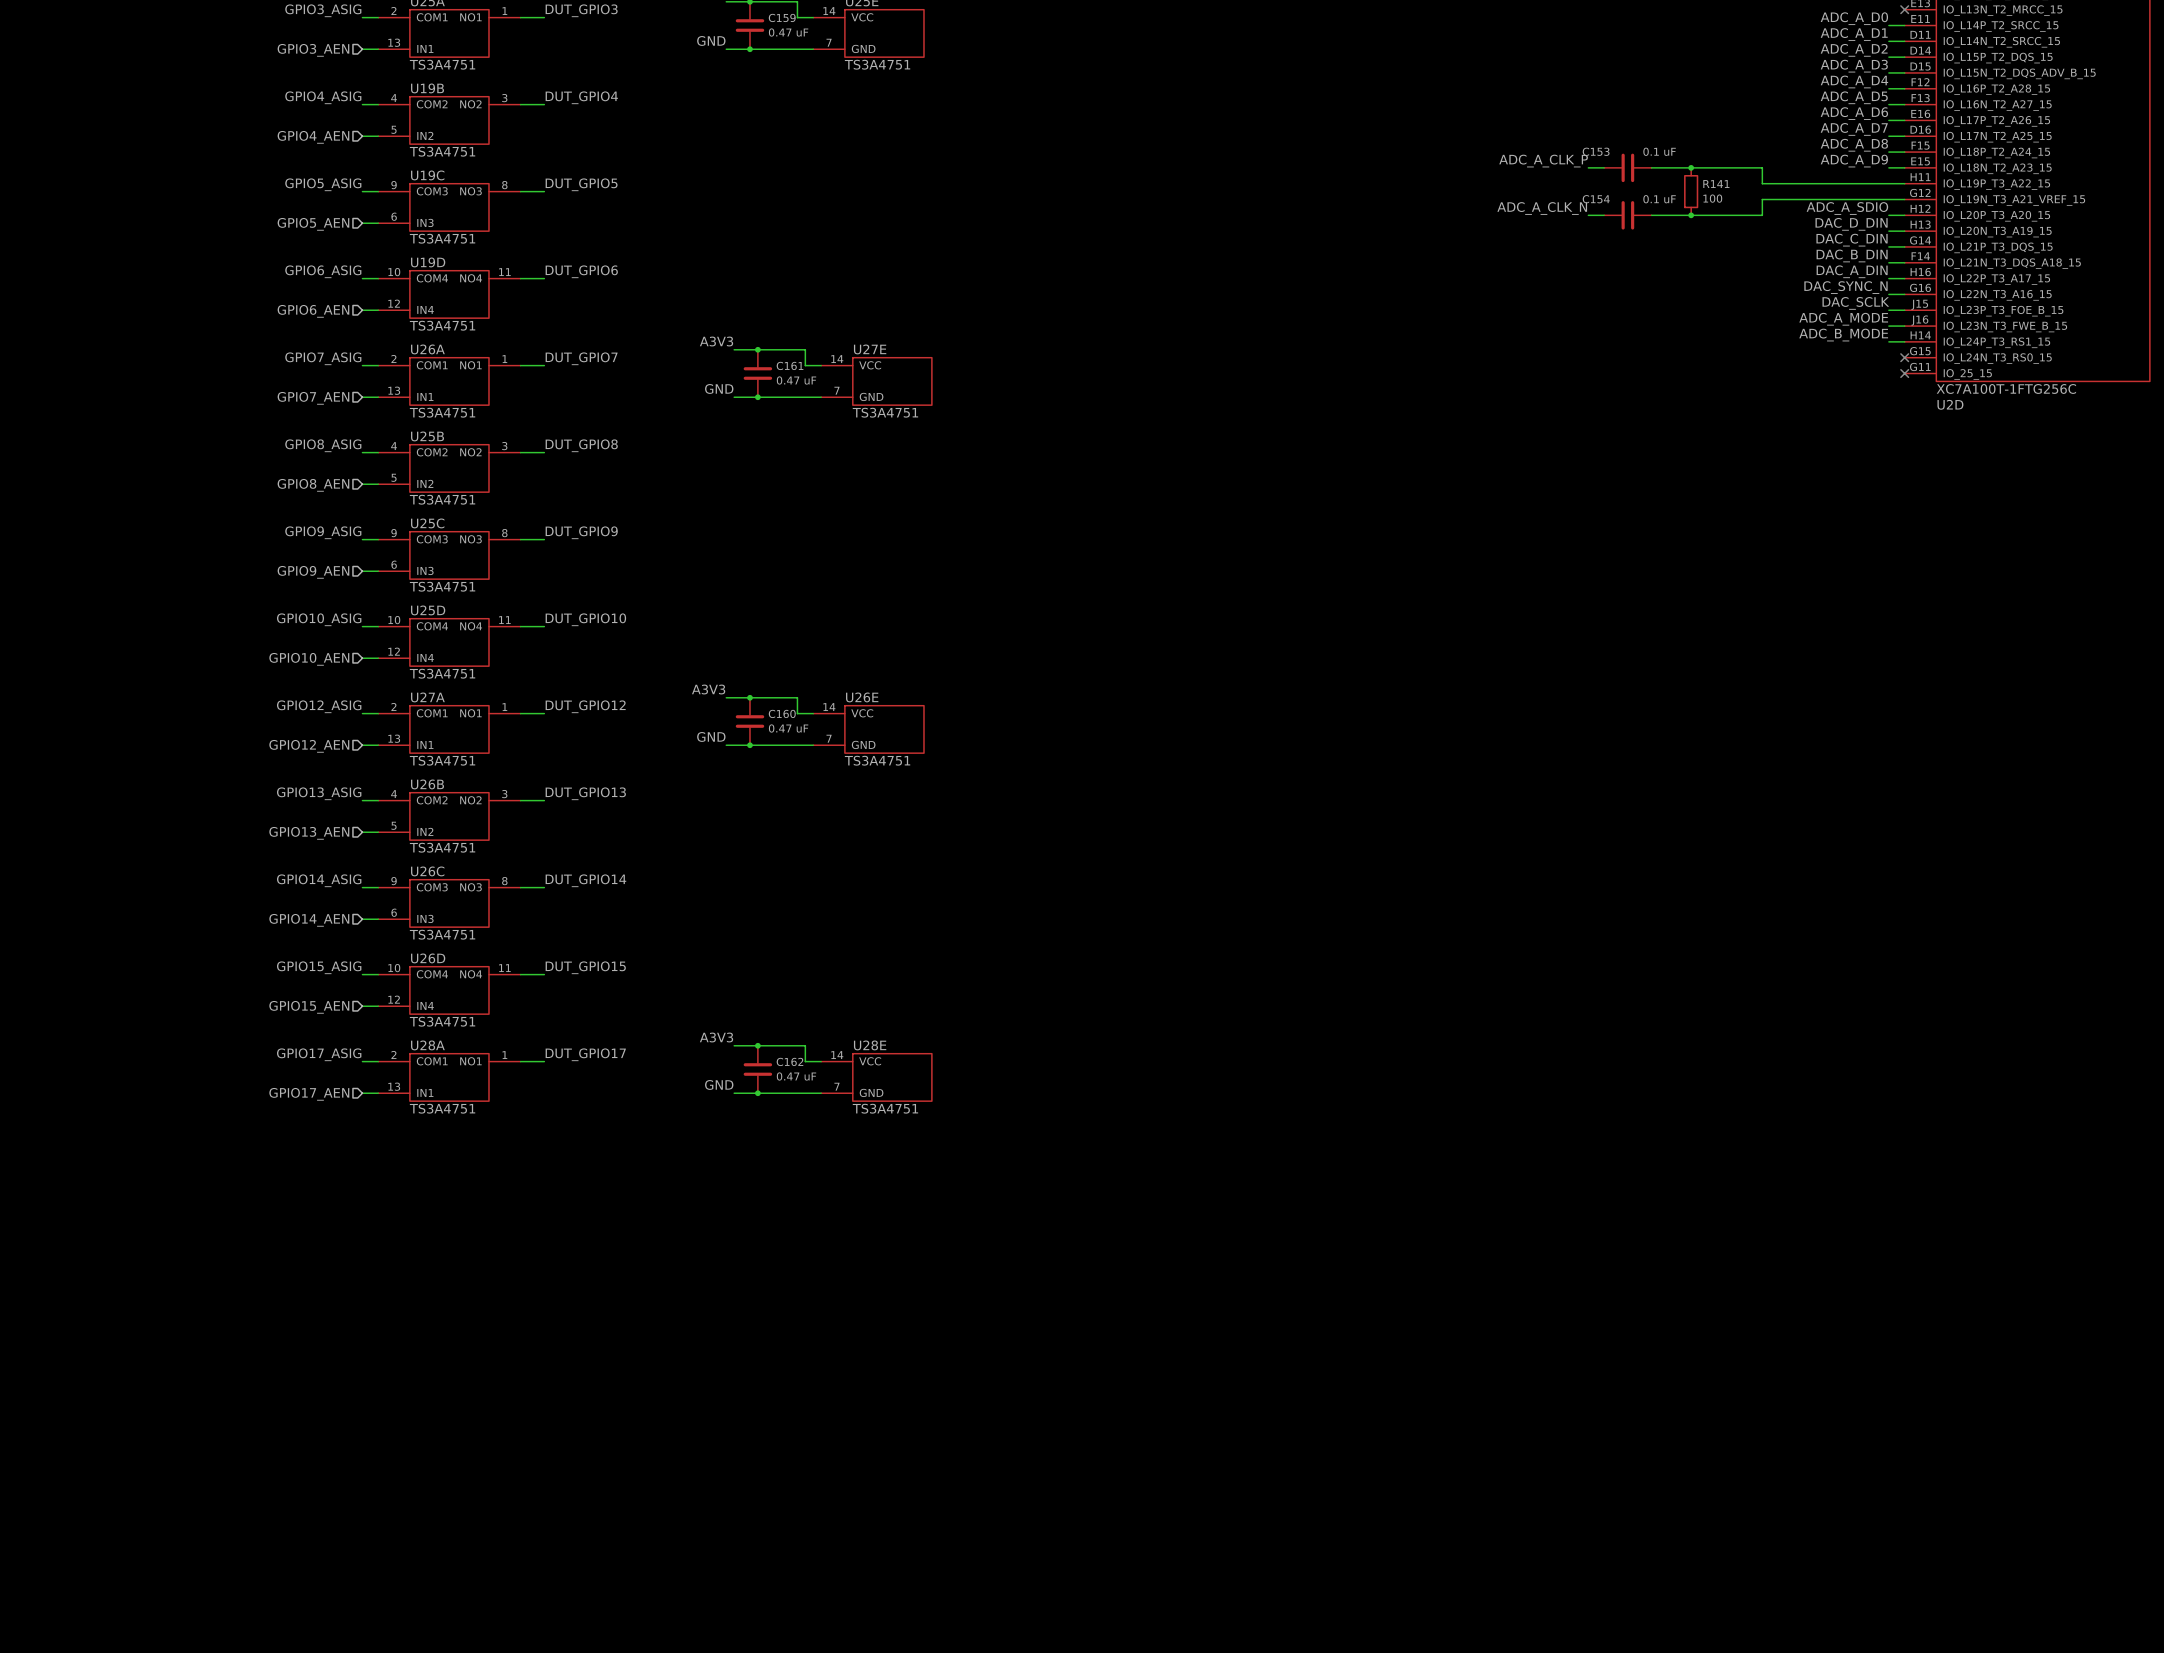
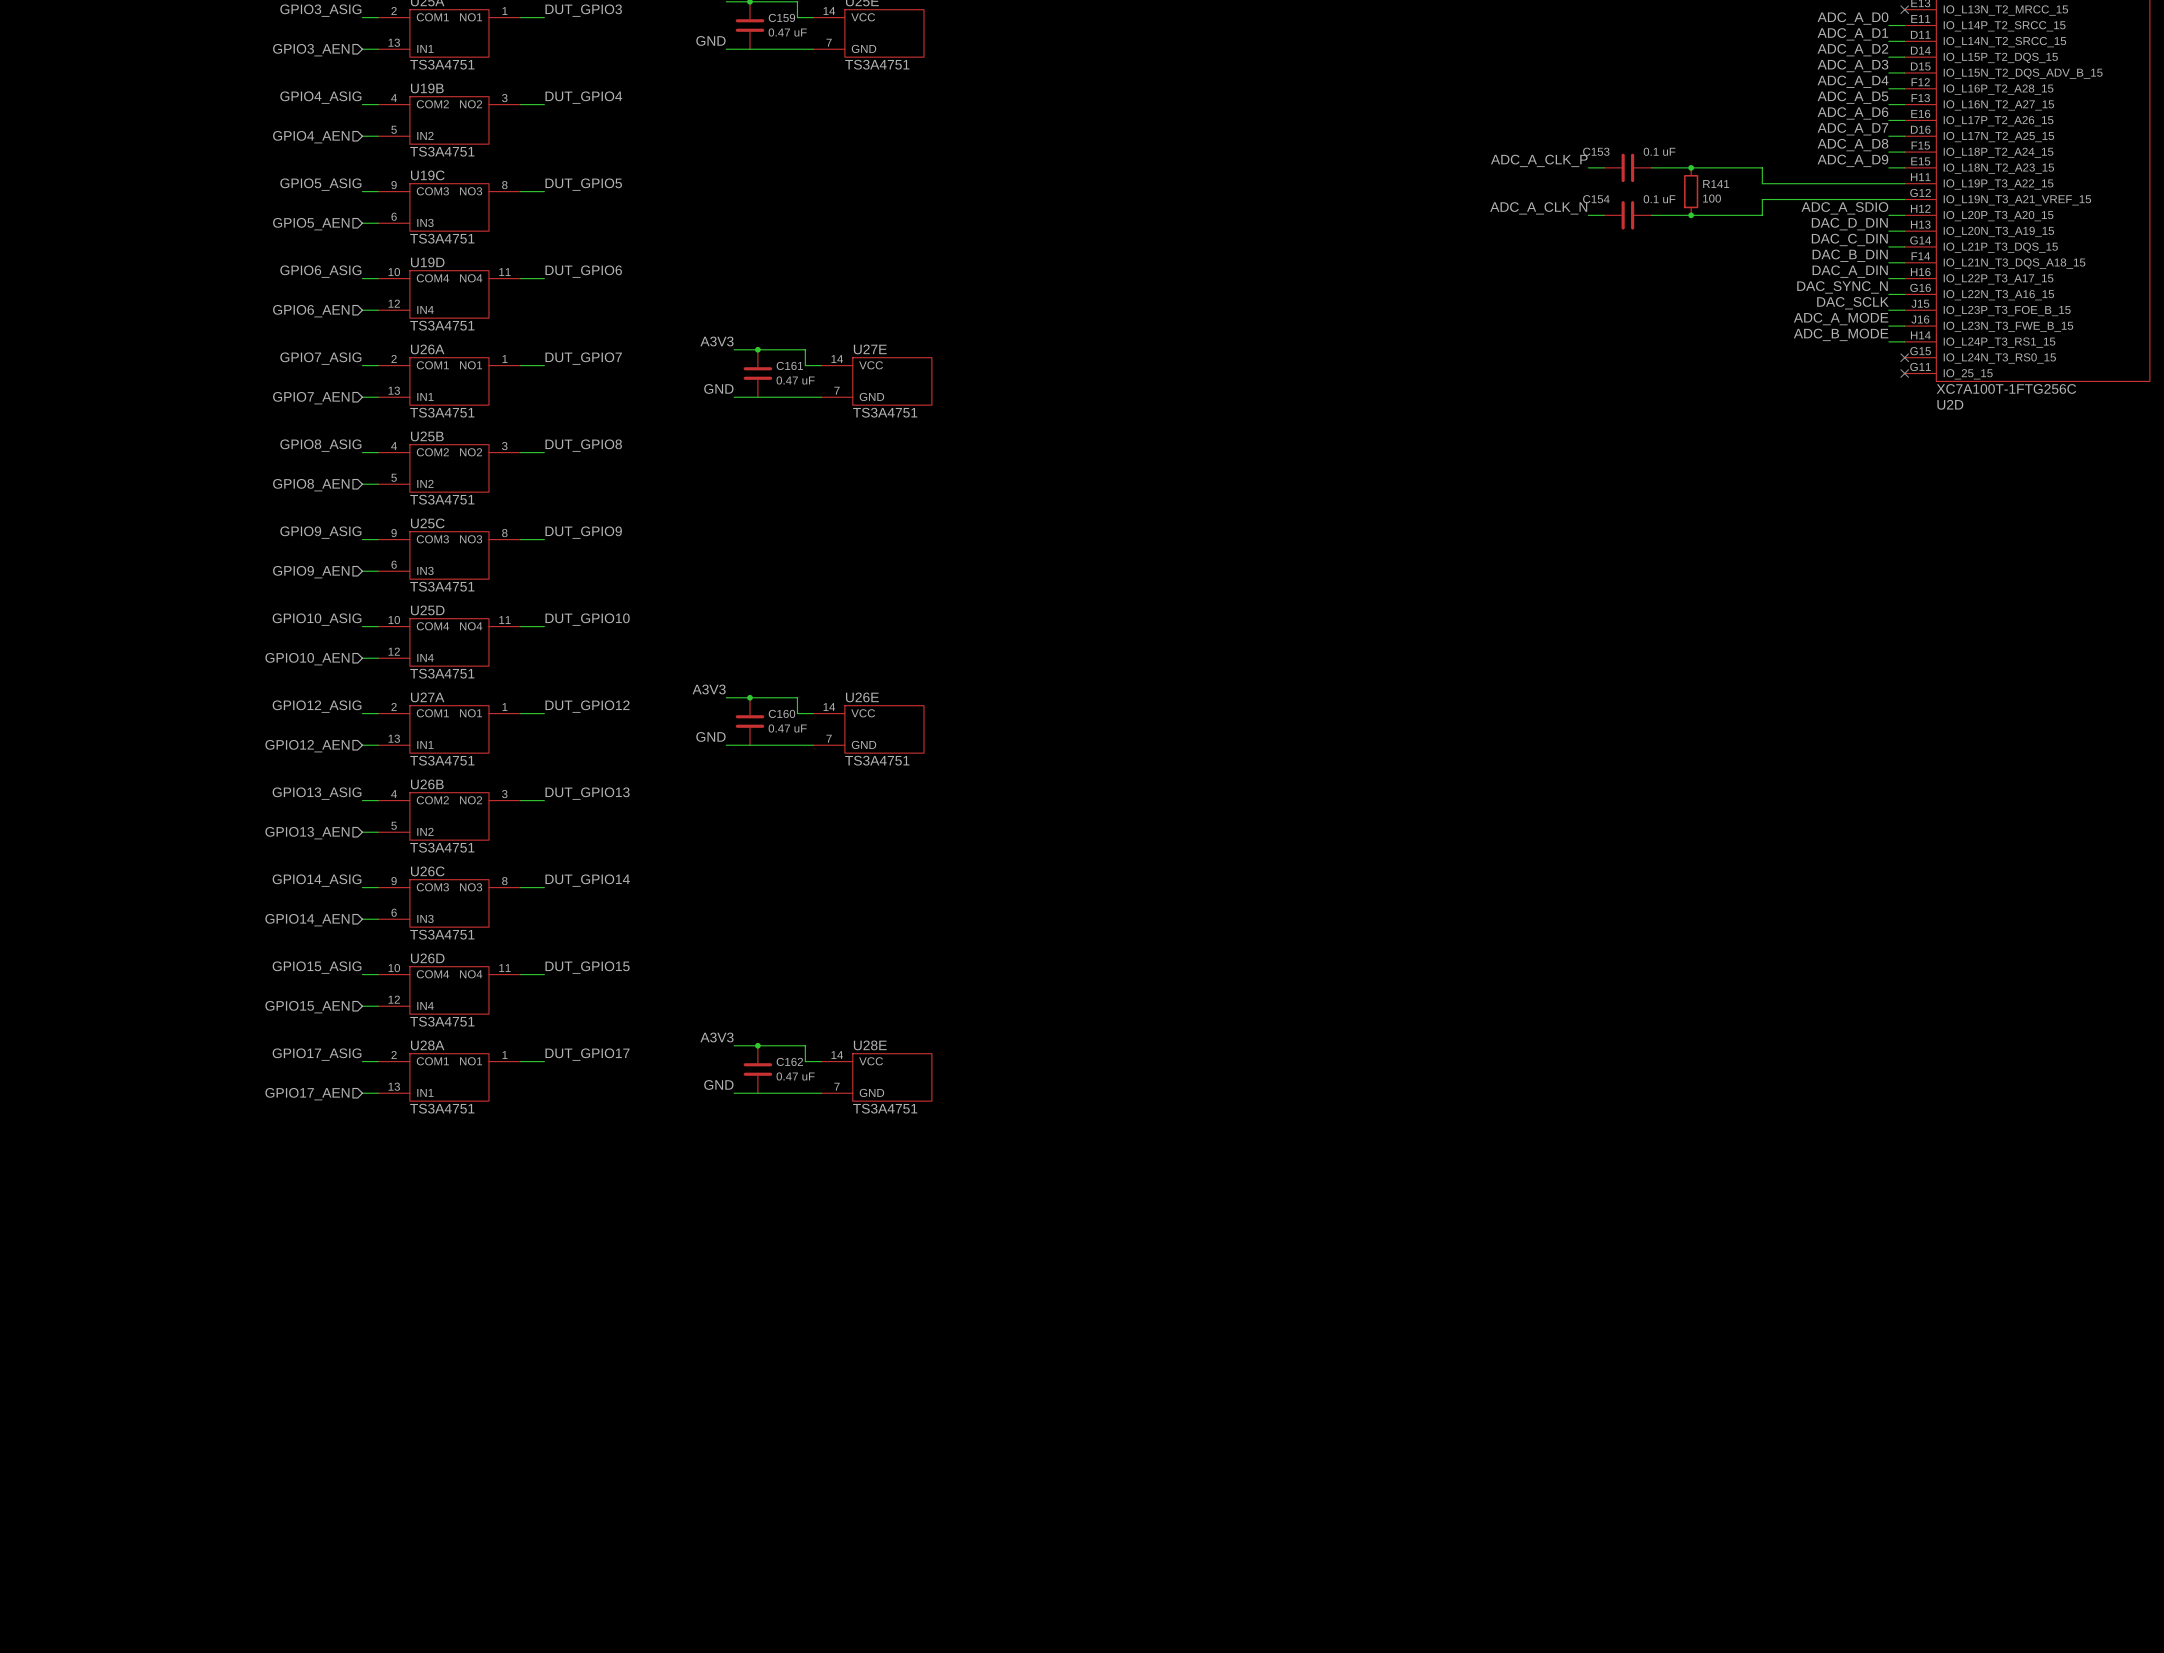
junction: (749, 49) -> none
junction: (757, 397) -> none
junction: (749, 745) -> none
junction: (757, 1093) -> none

